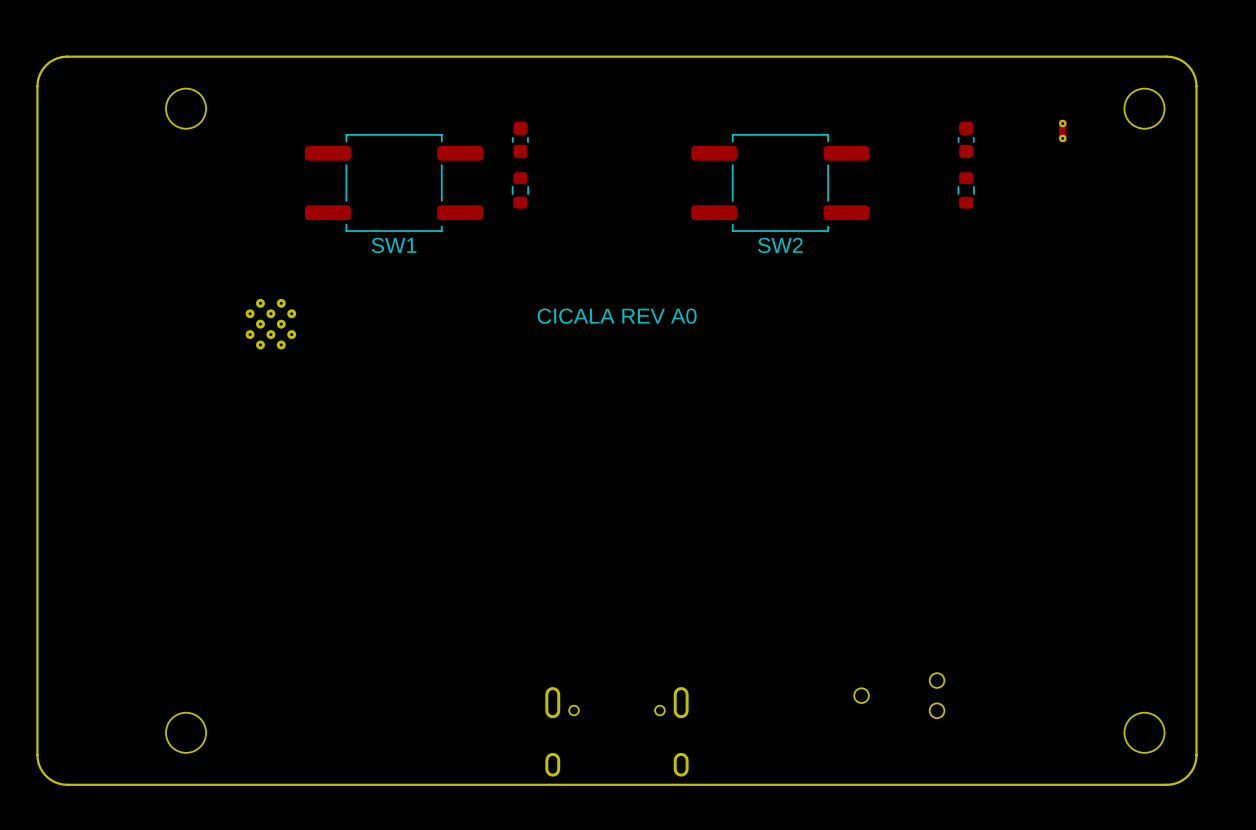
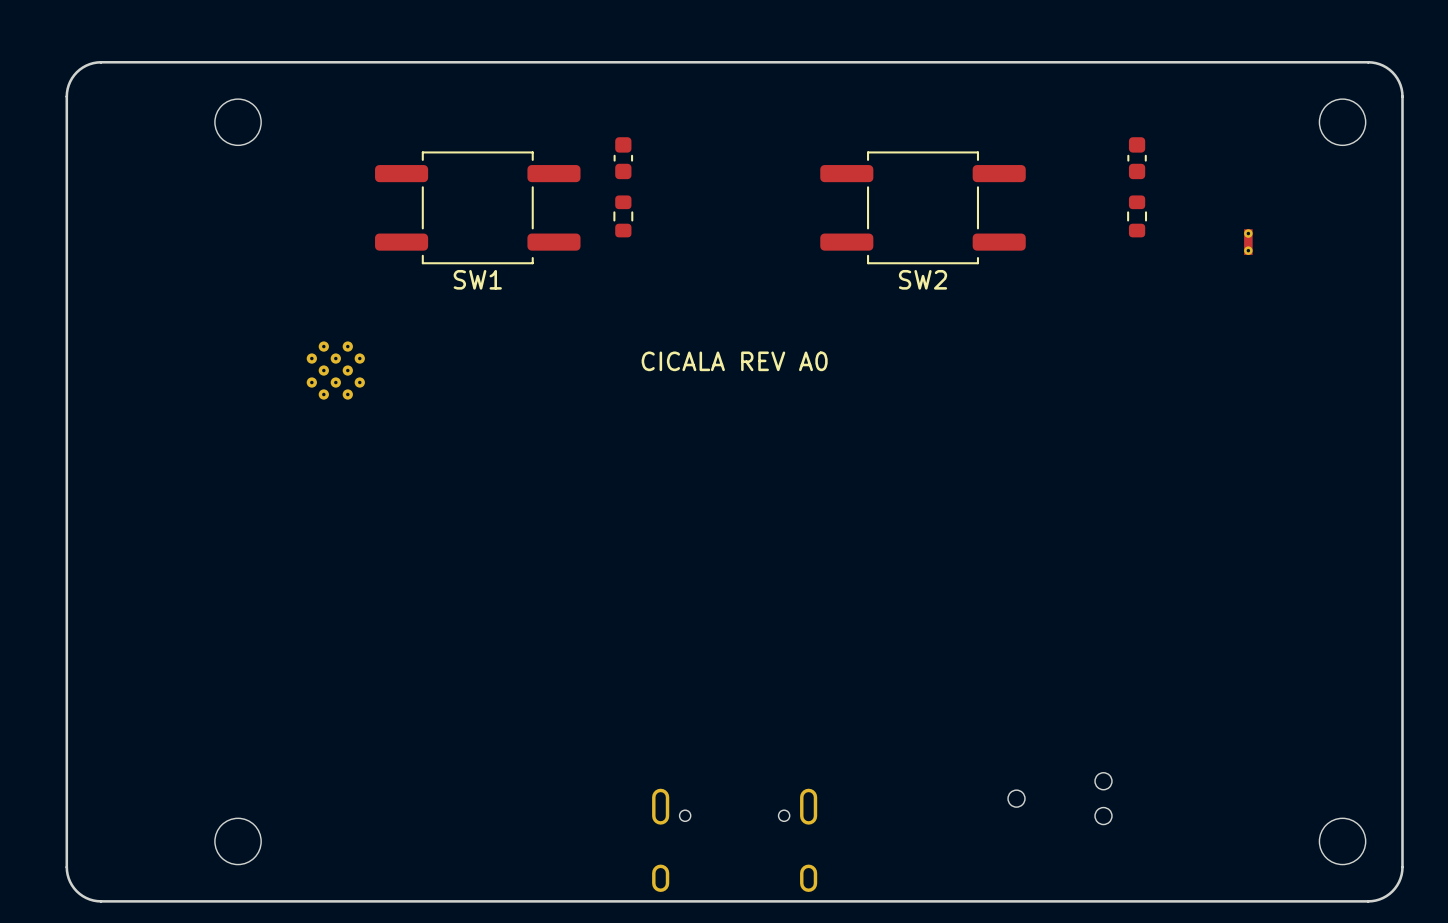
part position: (1062, 130) -> (1248, 242)

